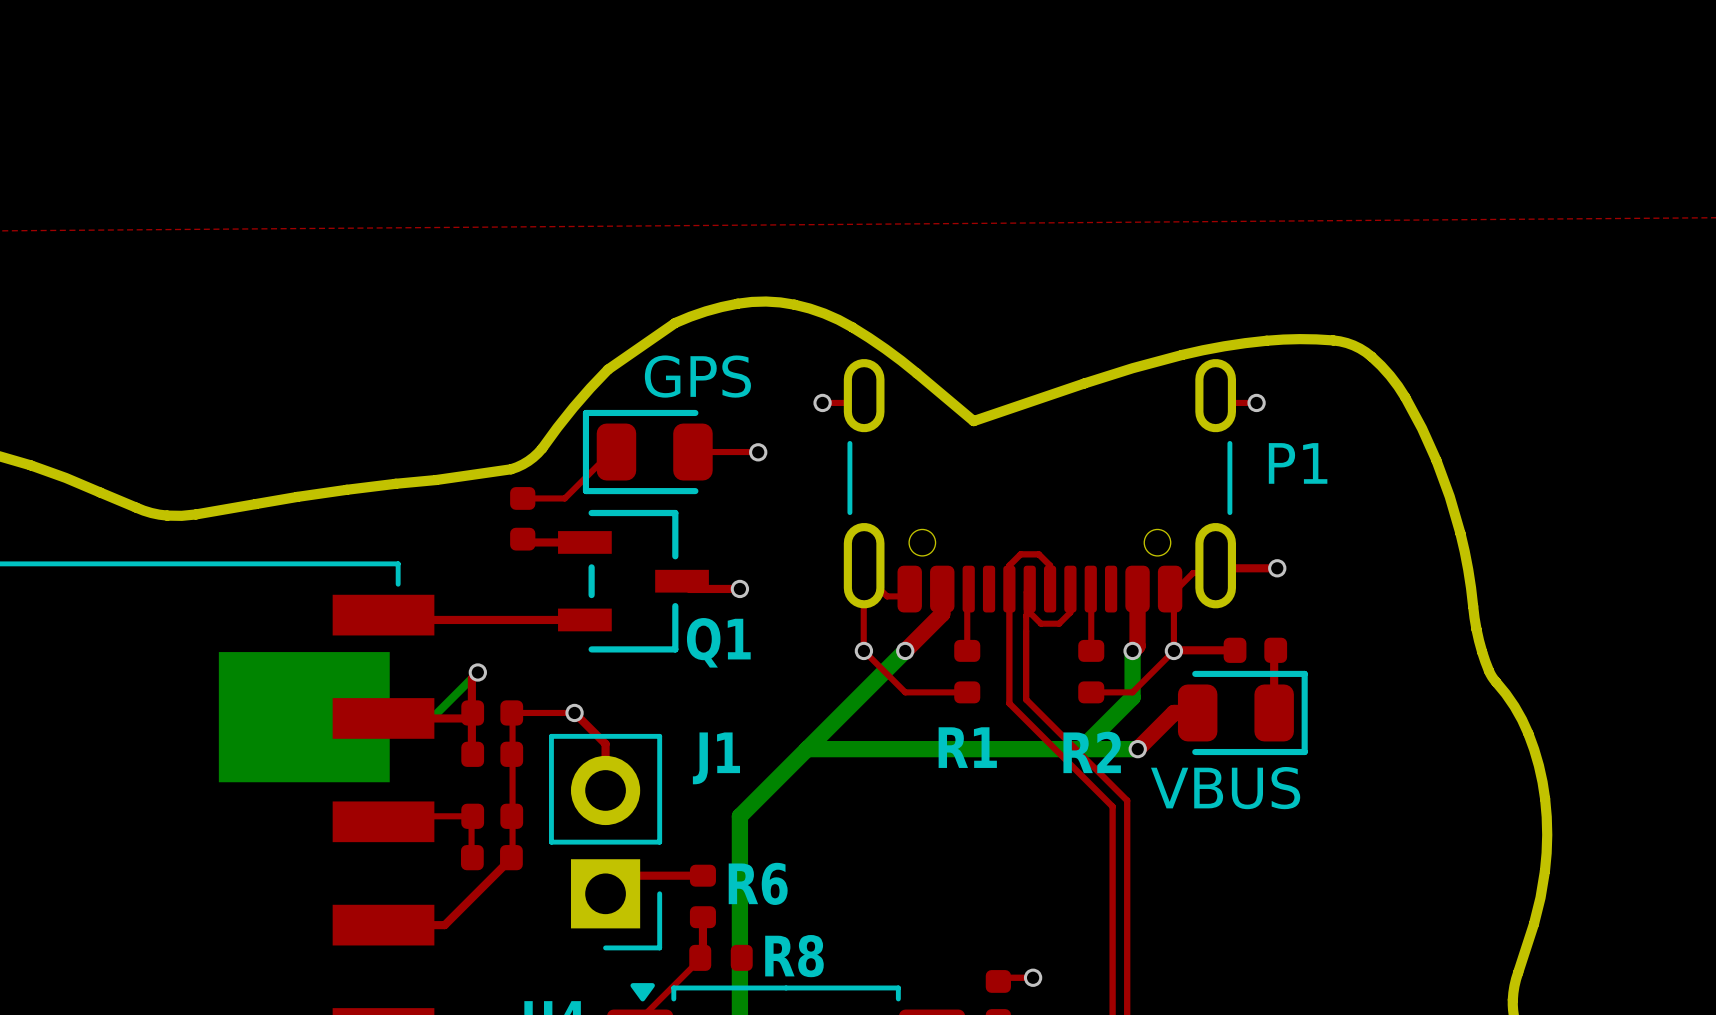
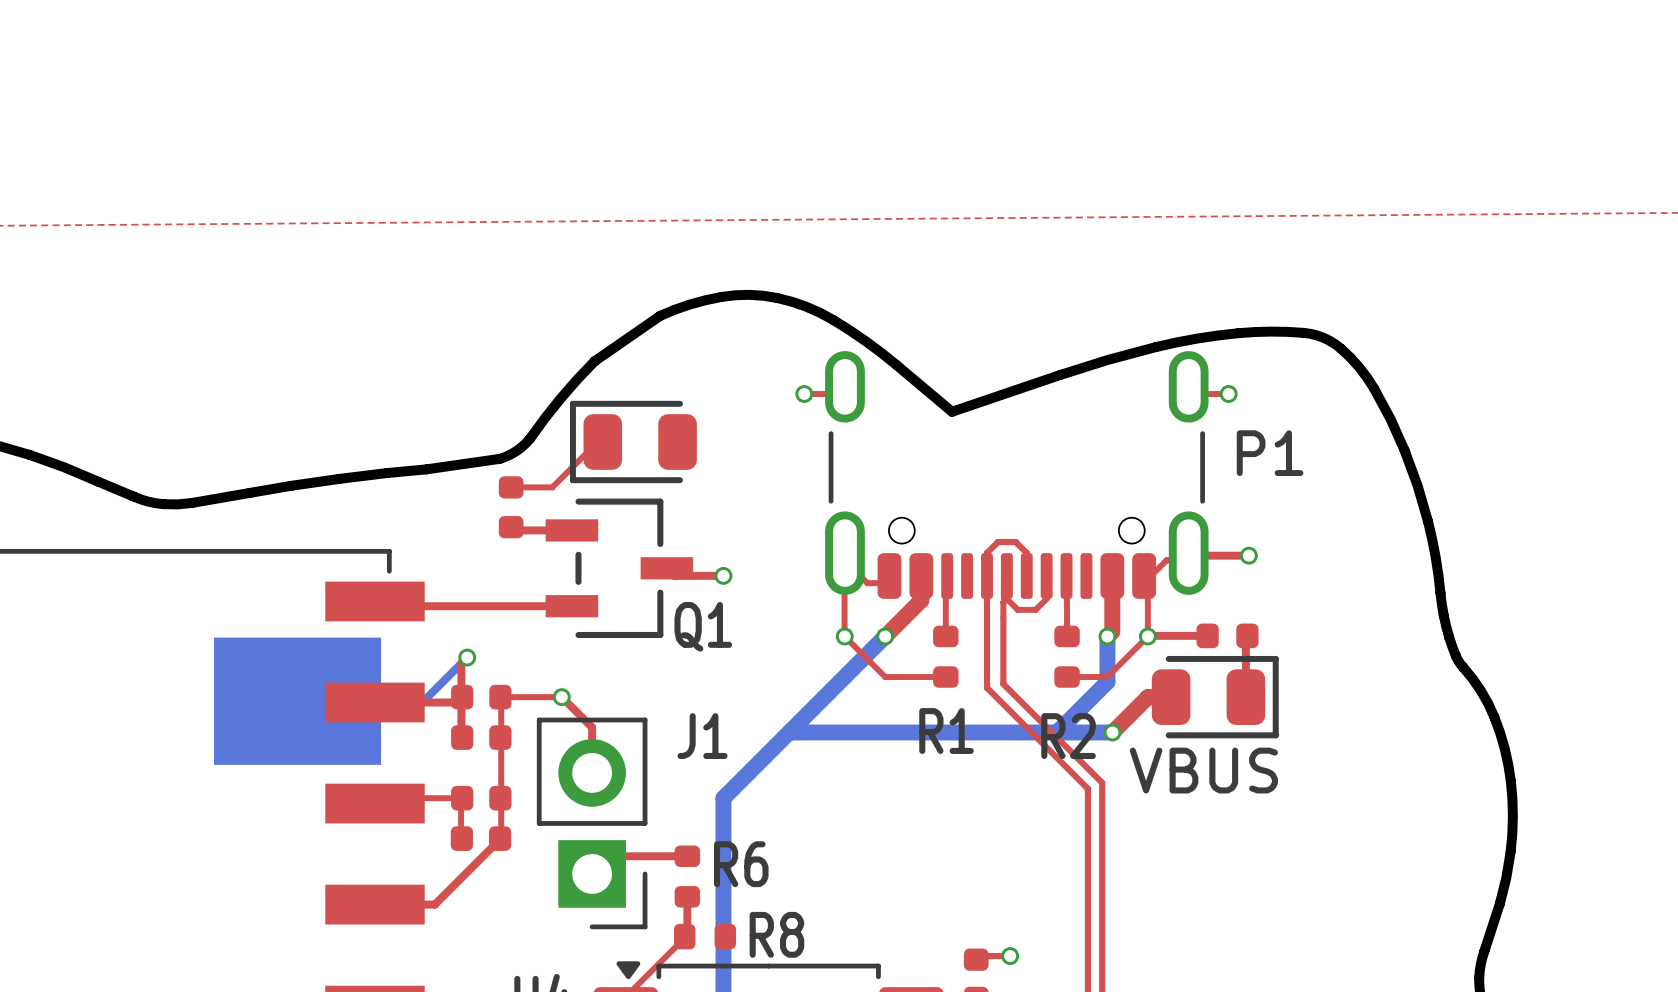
text: GPS (697, 376) -> none
top track: (692, 452) (757, 452) -> none
via: (758, 452) -> none

